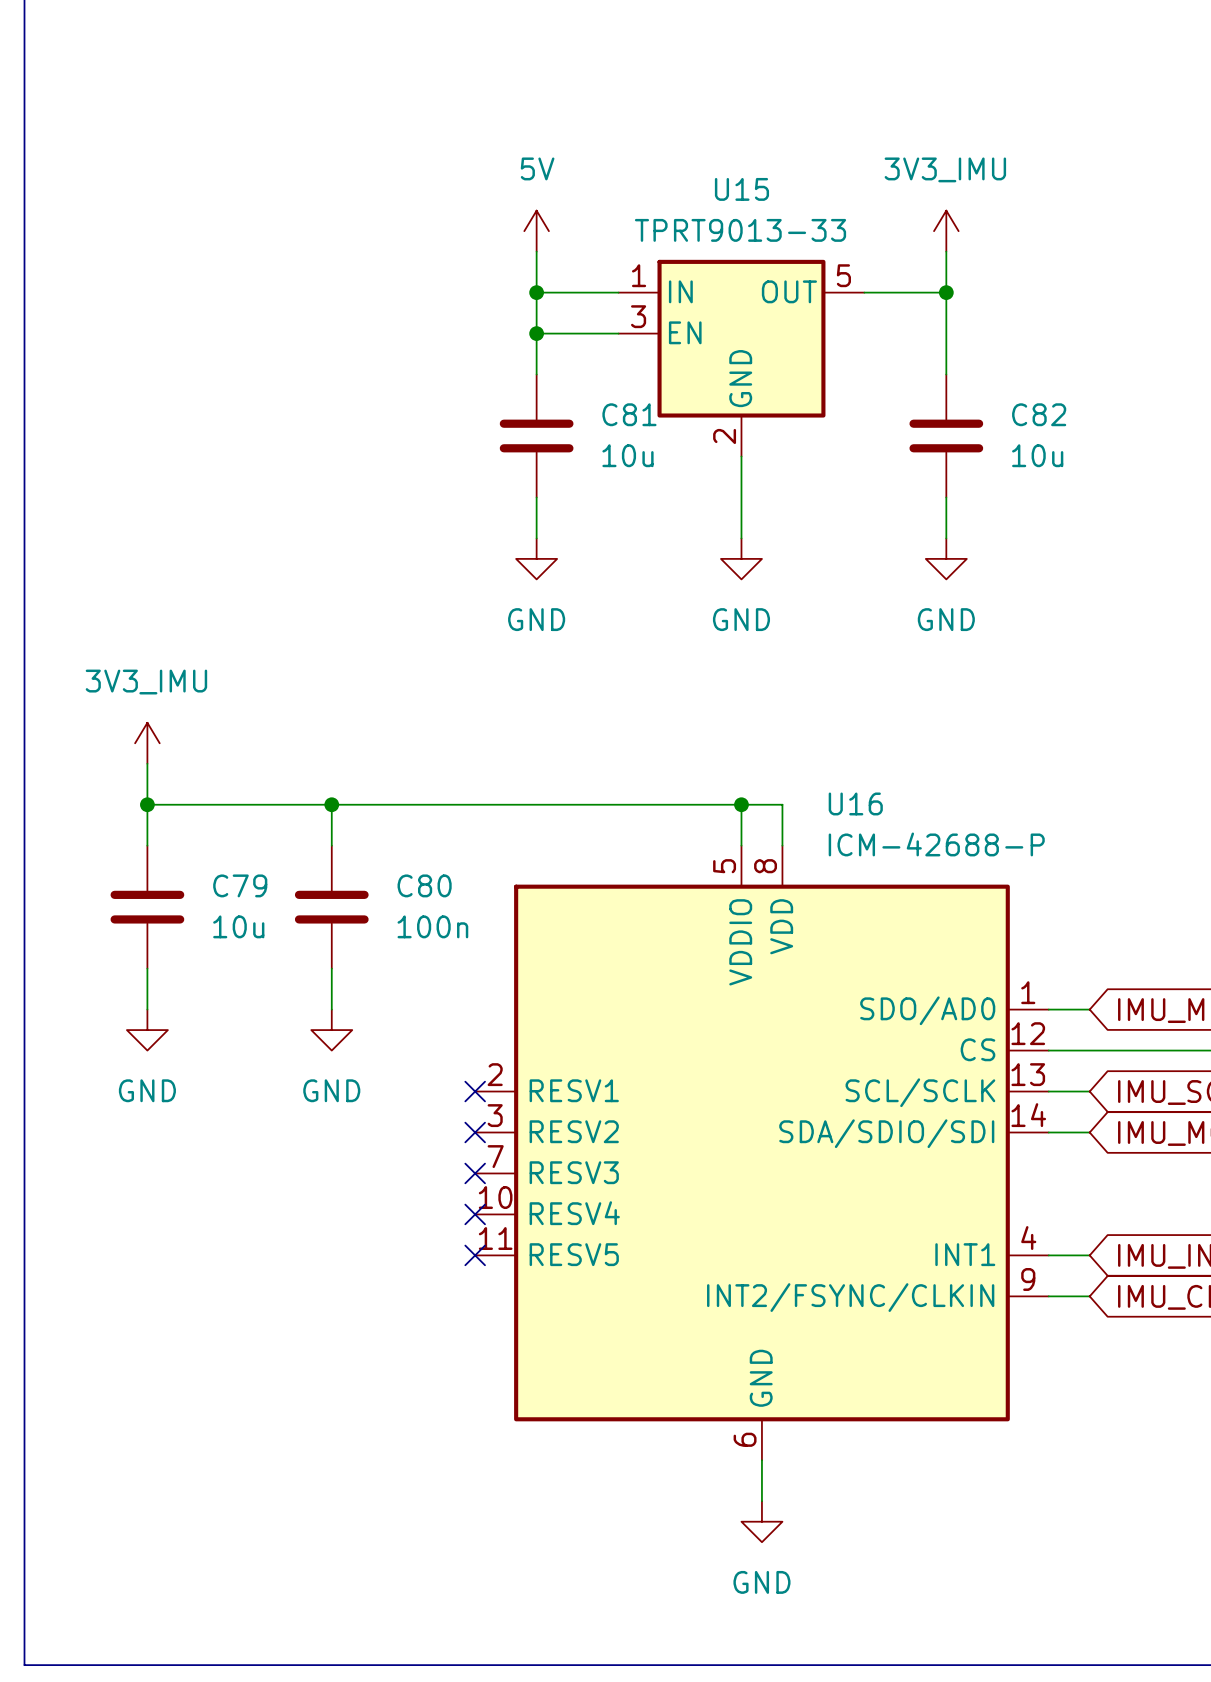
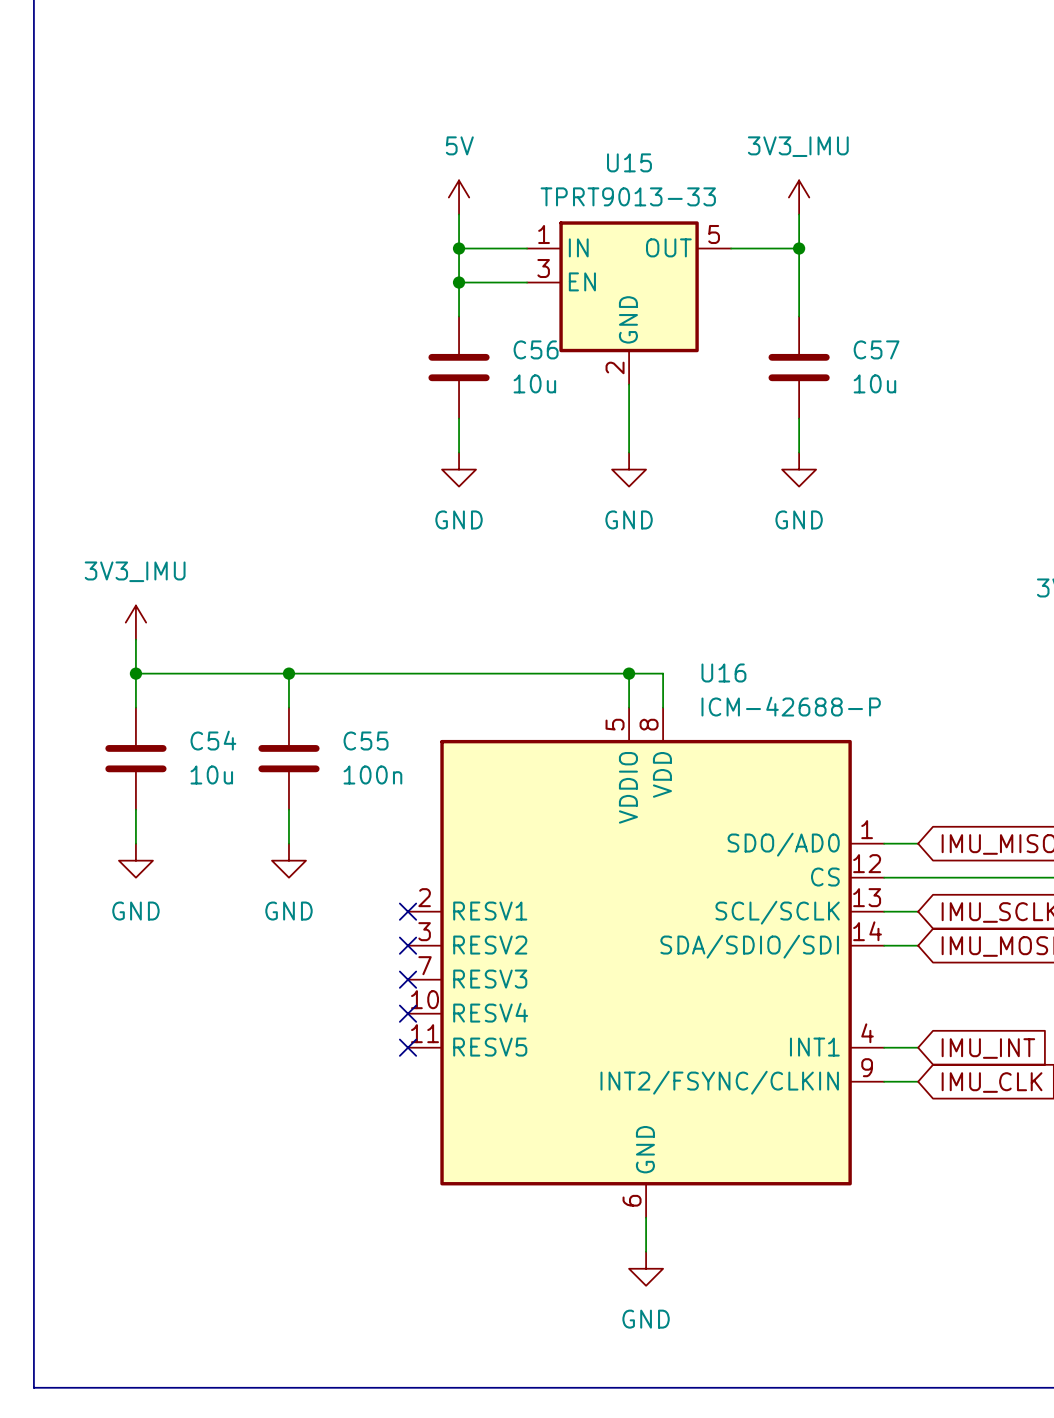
C81 name: C81 (629, 414) -> C56 (536, 349)
C82 name: C82 (1039, 414) -> C57 (876, 349)
C79 name: C79 (240, 885) -> C54 (213, 740)
C80 name: C80 (424, 885) -> C55 (366, 741)

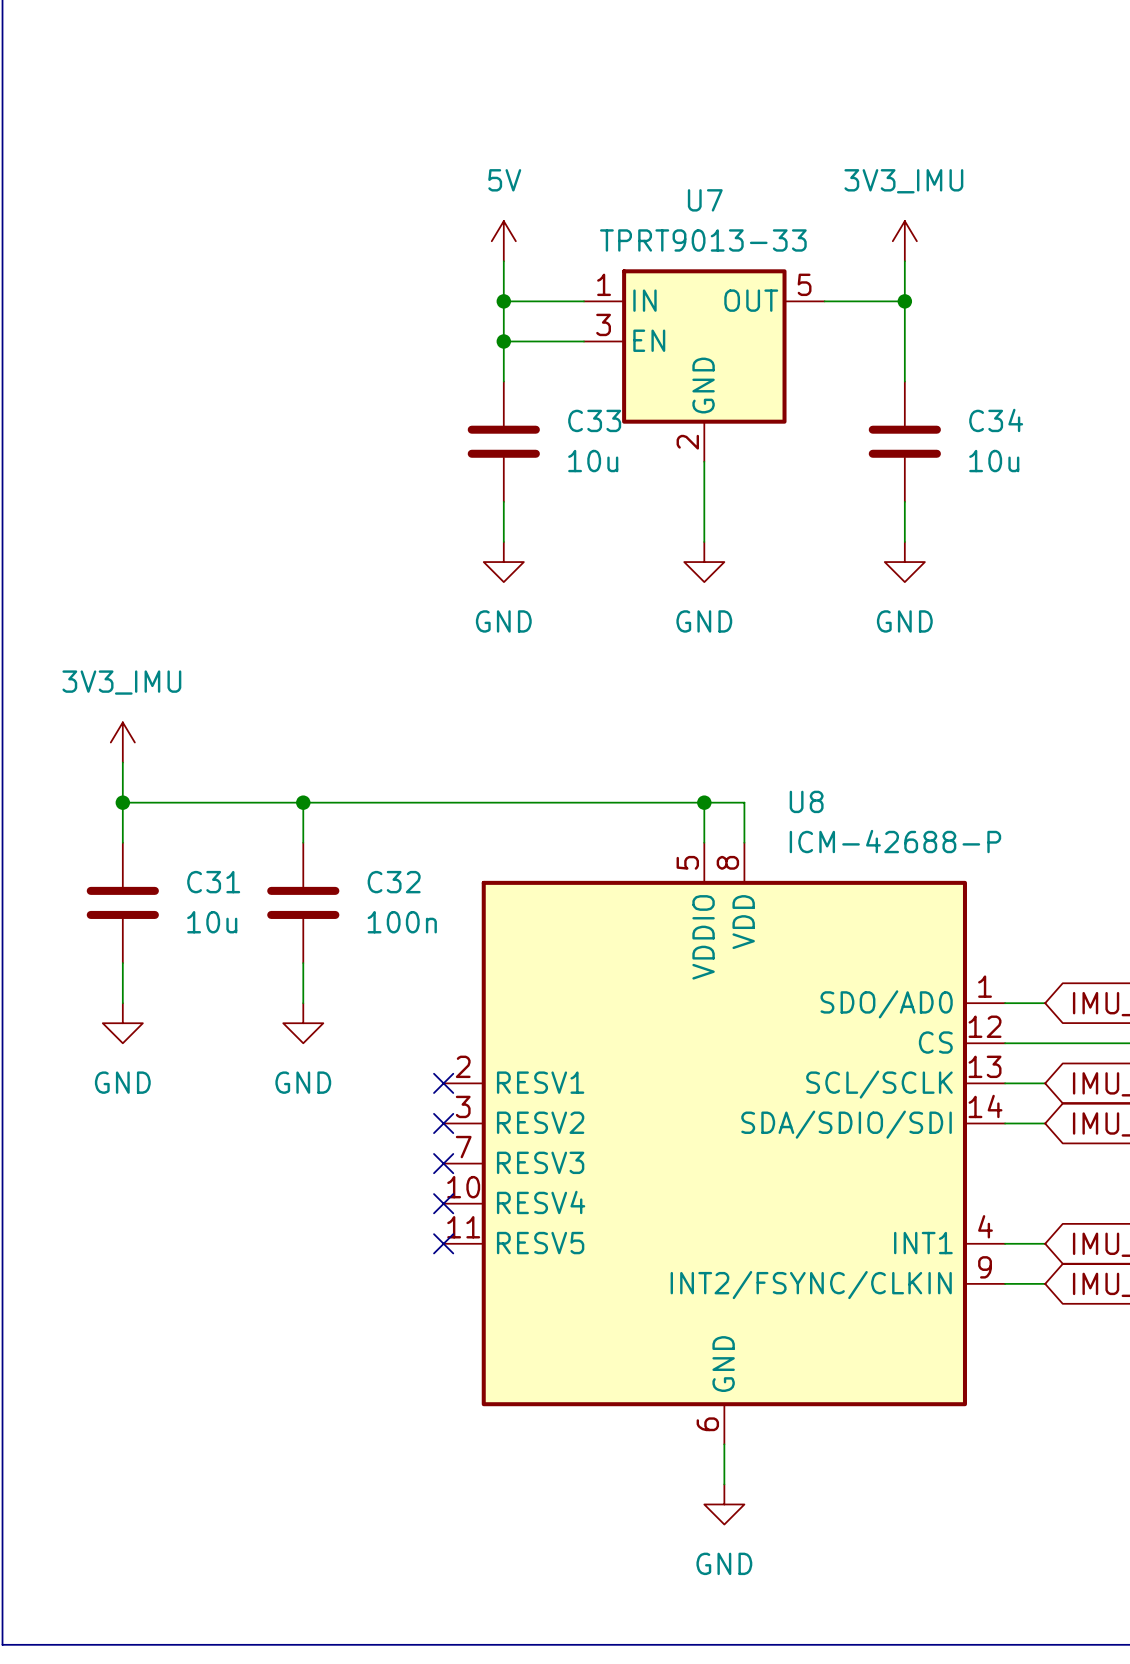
U15 name: U15 (629, 162) -> U7 (705, 200)
C56 name: C56 (536, 349) -> C33 (594, 420)
C57 name: C57 (876, 349) -> C34 (996, 420)
U16 name: U16 (723, 672) -> U8 (806, 801)
C54 name: C54 (213, 740) -> C31 (213, 882)
C55 name: C55 (366, 741) -> C32 (394, 882)

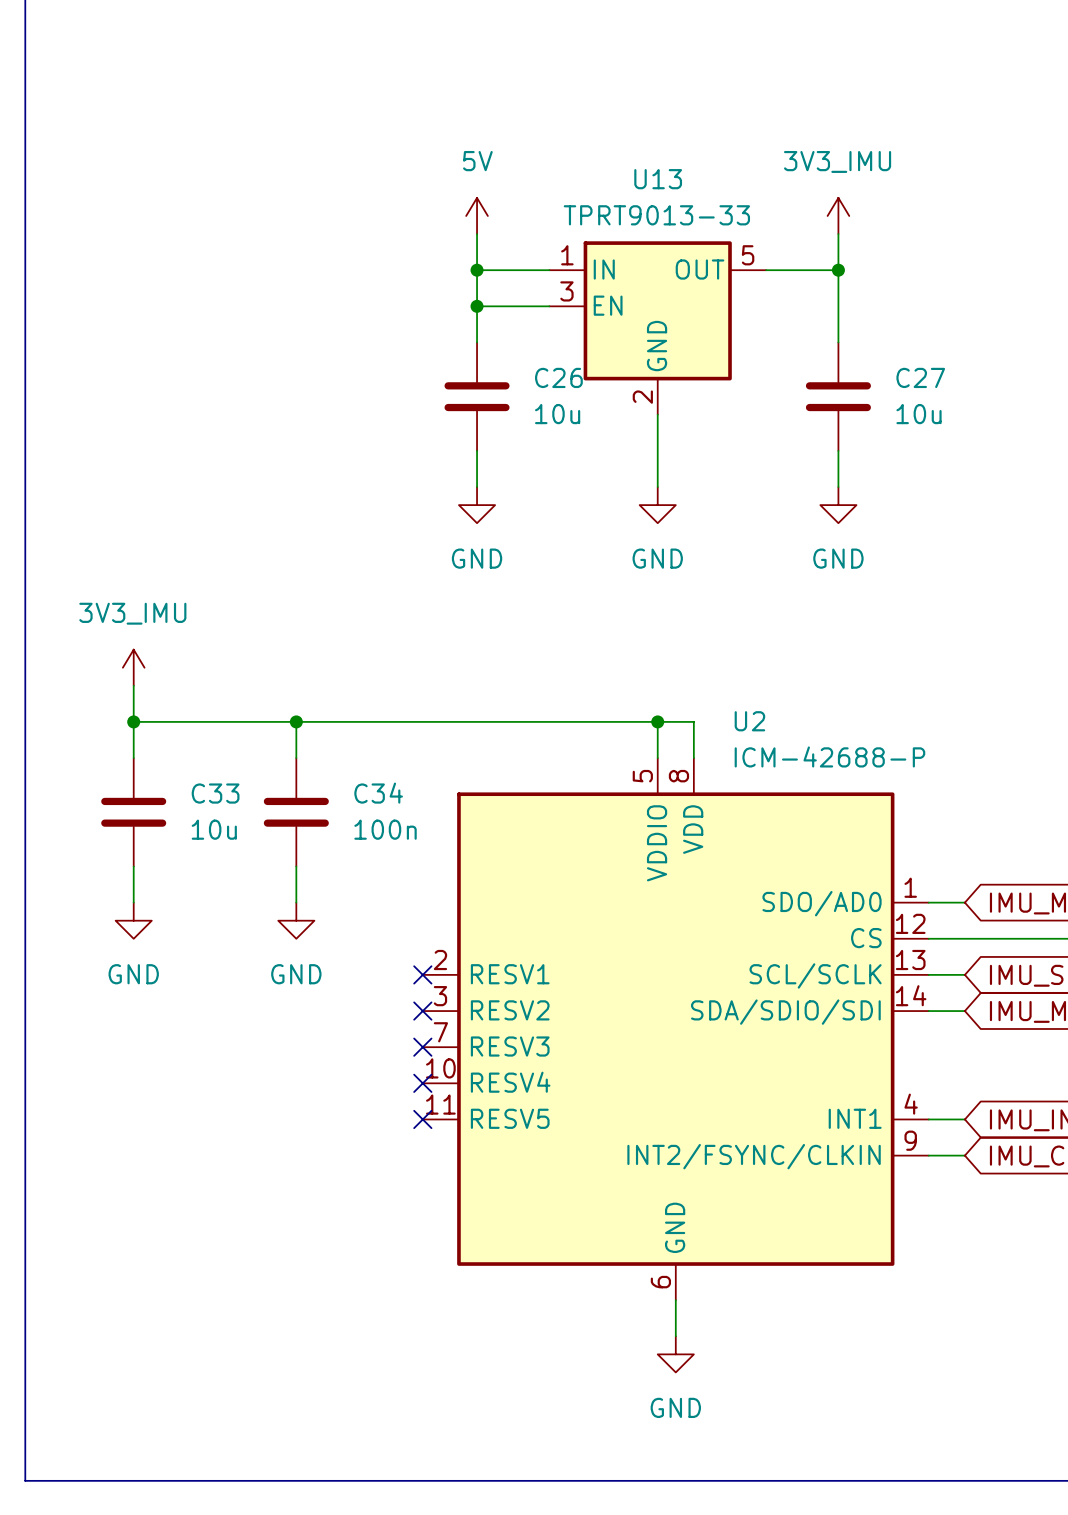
U7 name: U7 (705, 200) -> U13 (658, 179)
C33 name: C33 (594, 420) -> C26 (558, 377)
C34 name: C34 (996, 420) -> C27 (920, 377)
U8 name: U8 (806, 801) -> U2 (749, 721)
C31 name: C31 (213, 882) -> C33 (215, 793)
C32 name: C32 (394, 882) -> C34 (378, 793)

